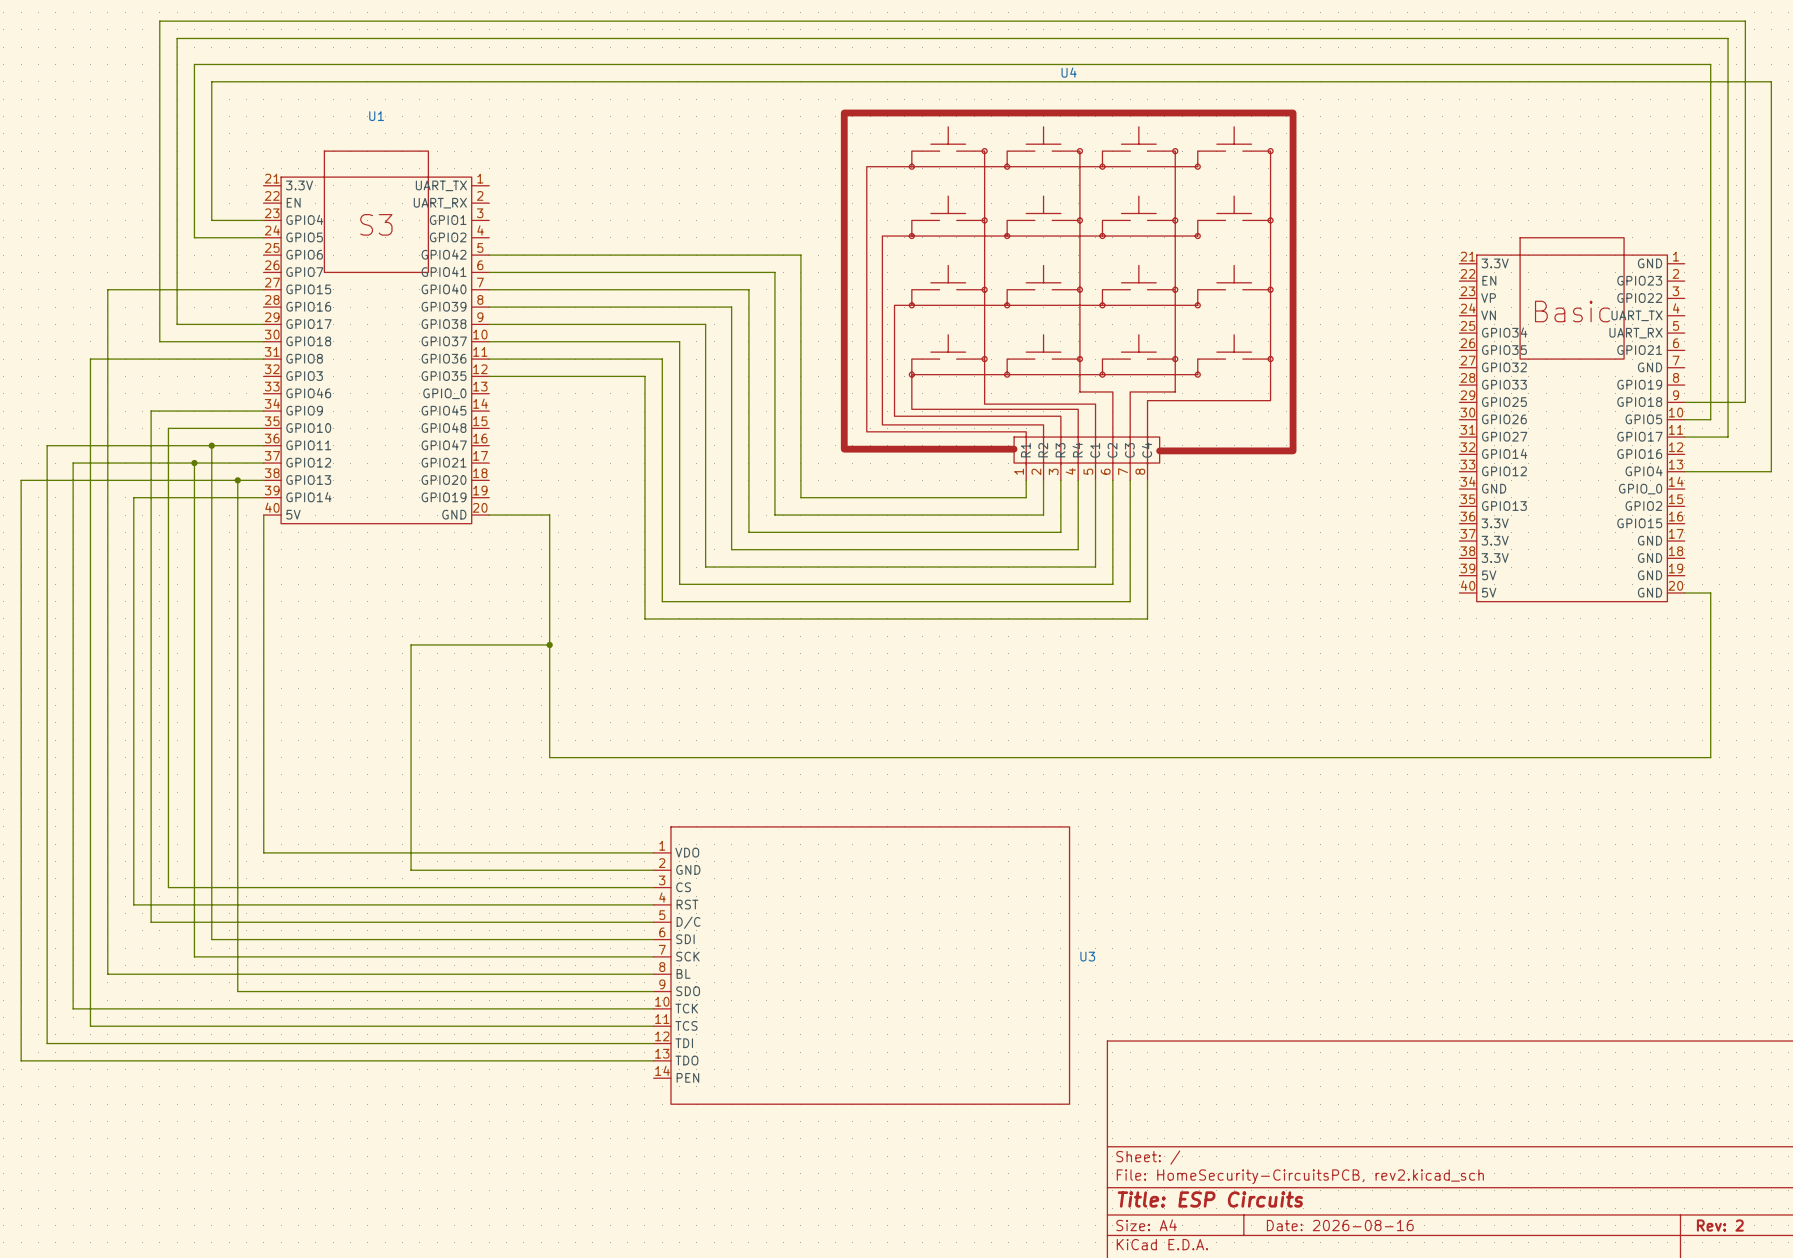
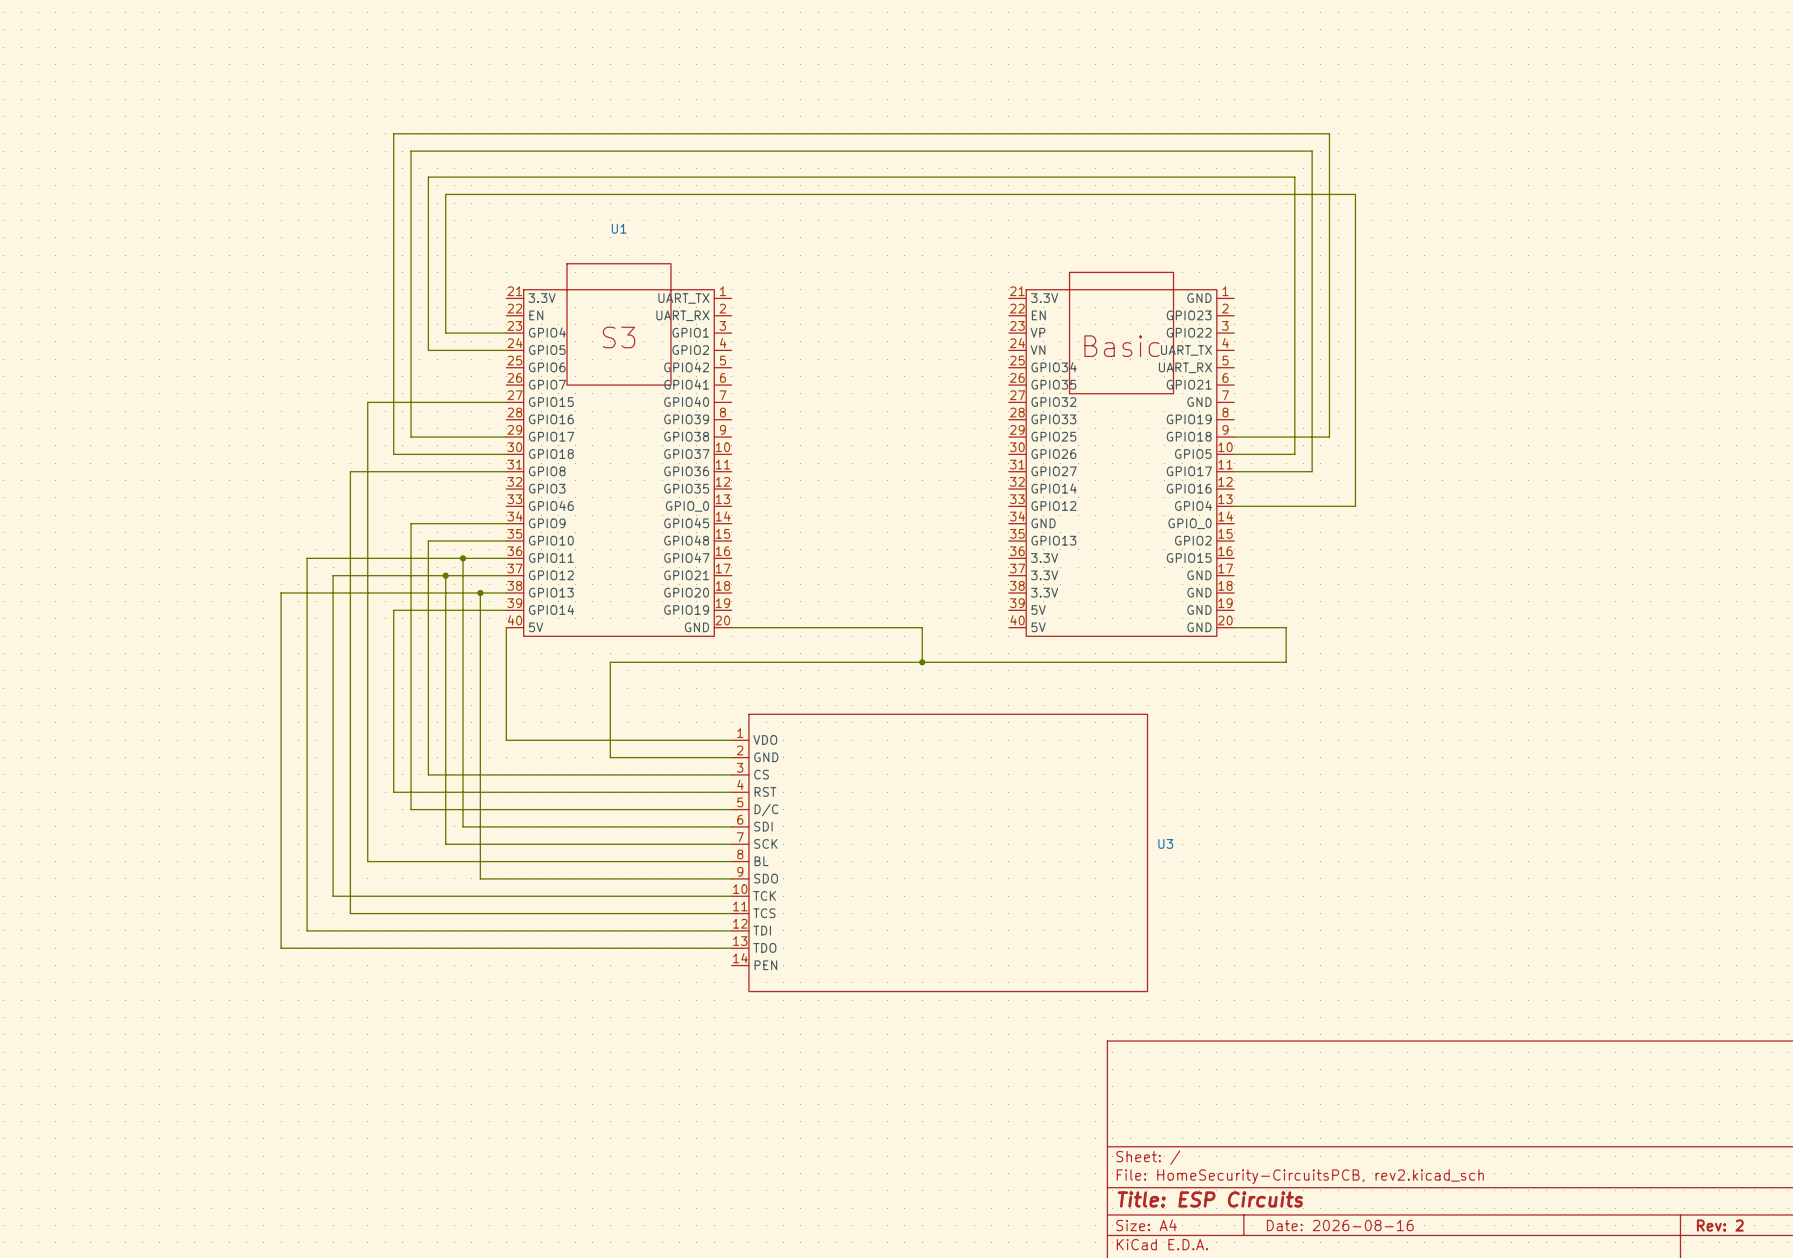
wire: (263, 220) (211, 220) (211, 81) (1771, 81) (1771, 471) (1684, 471) -> none
wire: (263, 237) (194, 237) (194, 64) (1710, 64) (1710, 419) (1684, 419) -> none
wire: (489, 255) (800, 255) (800, 497) (1026, 497) (1026, 480) -> none
wire: (489, 272) (774, 272) (774, 515) (1043, 515) (1043, 480) -> none
wire: (263, 289) (107, 289) (107, 974) (653, 974) -> none
wire: (489, 289) (748, 289) (748, 532) (1060, 532) (1060, 480) -> none
U4: (1068, 294) -> none
wire: (489, 307) (731, 307) (731, 549) (1078, 549) (1078, 480) -> none
wire: (263, 324) (177, 324) (177, 38) (1728, 38) (1728, 437) (1684, 437) -> none
wire: (489, 324) (705, 324) (705, 567) (1095, 567) (1095, 480) -> none
wire: none -> (506, 333) (445, 333) (445, 194) (1355, 194) (1355, 506) (1234, 506)
U1 position: (376, 337) -> (618, 450)
wire: (263, 341) (159, 341) (159, 21) (1745, 21) (1745, 402) (1684, 402) -> none
wire: (489, 341) (679, 341) (679, 584) (1112, 584) (1112, 480) -> none
wire: none -> (506, 350) (428, 350) (428, 177) (1294, 177) (1294, 454) (1234, 454)
wire: (263, 359) (90, 359) (90, 1026) (653, 1026) -> none
wire: (489, 359) (662, 359) (662, 601) (1130, 601) (1130, 480) -> none
wire: (489, 376) (644, 376) (644, 618) (1147, 618) (1147, 480) -> none
wire: none -> (506, 402) (367, 402) (367, 861) (731, 861)
wire: (263, 411) (151, 411) (151, 922) (653, 922) -> none
part: (1572, 419) -> none
wire: (263, 428) (168, 428) (168, 887) (653, 887) -> none
wire: none -> (506, 437) (411, 437) (411, 151) (1312, 151) (1312, 471) (1234, 471)
wire: none -> (1234, 437) (1329, 437) (1329, 133) (393, 133) (393, 454) (506, 454)
wire: (211, 445) (211, 939) (653, 939) -> none
junction: (211, 445) -> none
wire: (263, 445) (47, 445) (47, 1043) (653, 1043) -> none
part: none -> (1121, 454)
wire: (194, 463) (194, 956) (653, 956) -> none
junction: (194, 463) -> none
wire: (263, 463) (73, 463) (73, 1008) (653, 1008) -> none
wire: none -> (506, 471) (350, 471) (350, 913) (731, 913)
wire: (237, 480) (237, 991) (653, 991) -> none
junction: (237, 480) -> none
wire: (263, 480) (21, 480) (21, 1060) (653, 1060) -> none
wire: (263, 497) (133, 497) (133, 904) (653, 904) -> none
wire: (263, 515) (263, 852) (653, 852) -> none
wire: (489, 515) (549, 515) (549, 757) (610, 757) -> (1234, 627) (1286, 627) (1286, 662) (610, 662) (610, 757)
wire: none -> (506, 541) (428, 541) (428, 774) (731, 774)
wire: none -> (463, 558) (463, 826) (731, 826)
junction: none -> (463, 558)
wire: none -> (506, 558) (307, 558) (307, 930) (731, 930)
wire: none -> (445, 575) (445, 844) (731, 844)
junction: none -> (445, 575)
wire: none -> (506, 575) (333, 575) (333, 896) (731, 896)
wire: none -> (480, 592) (480, 878) (731, 878)
junction: none -> (480, 592)
wire: none -> (506, 592) (281, 592) (281, 948) (731, 948)
wire: (1684, 592) (1710, 592) (1710, 757) (731, 757) -> none
wire: none -> (506, 610) (393, 610) (393, 792) (731, 792)
wire: none -> (506, 627) (506, 740) (731, 740)
wire: none -> (731, 627) (922, 627) (922, 662)
wire: (411, 644) (549, 644) -> (411, 644) (411, 523) (506, 523)
junction: (549, 644) -> none
junction: none -> (922, 662)
wire: (411, 809) (411, 870) (653, 870) -> (411, 809) (731, 809)
U3 position: (861, 965) -> (939, 852)

